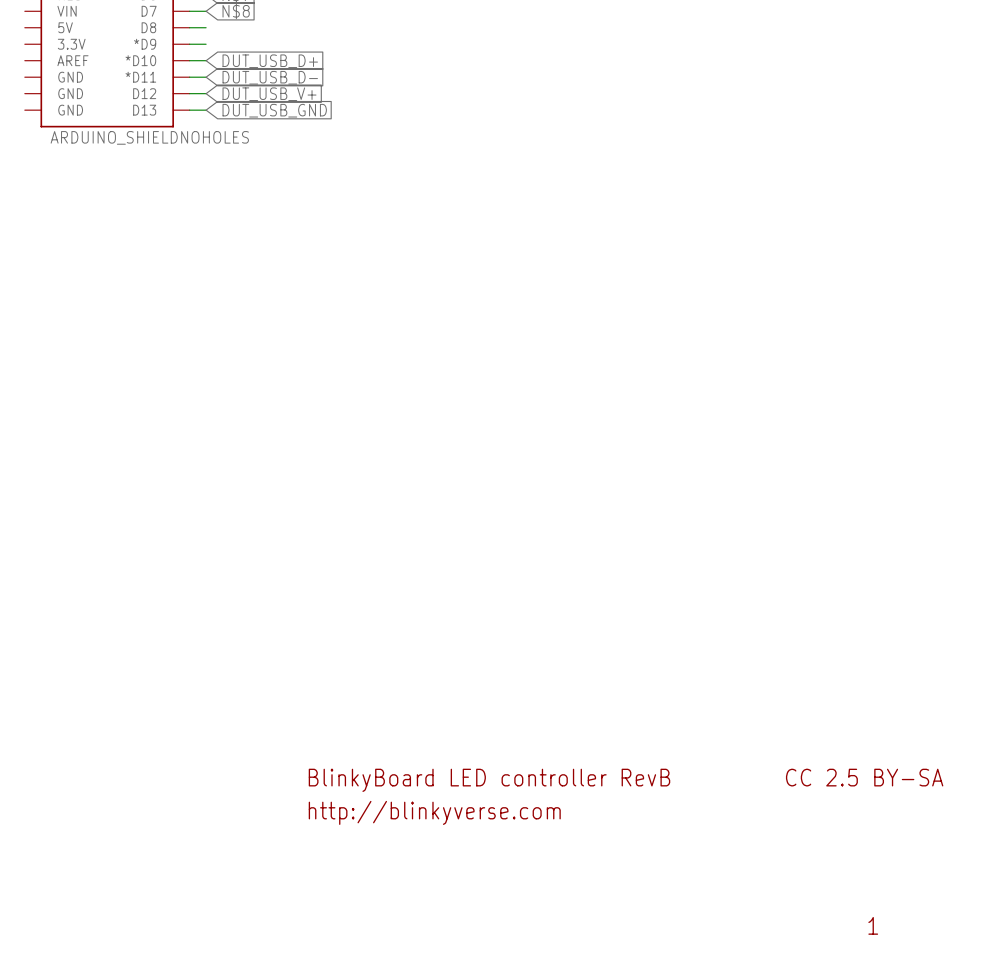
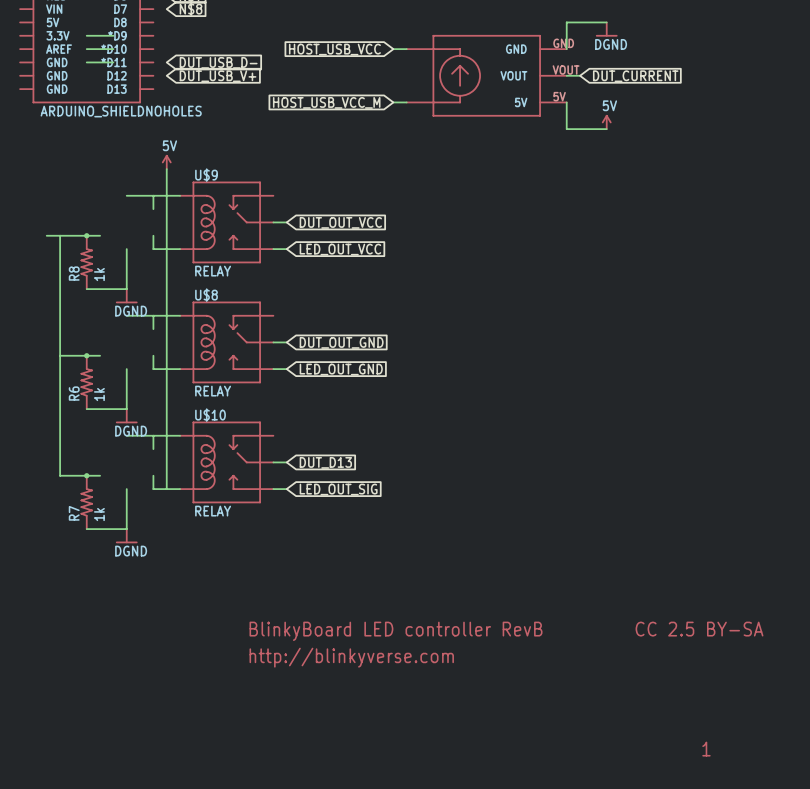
wire: (189, 11) (206, 11) -> none
wire: (189, 27) (206, 27) -> none
wire: none -> (606, 22) (566, 22) (566, 49)
power symbol: none -> DGND (606, 29)
wire: none -> (86, 35) (113, 35)
wire: (189, 44) (206, 44) -> none
wire: none -> (86, 49) (113, 49)
wire: (189, 60) (206, 60) -> none
wire: none -> (393, 49) (406, 49)
global label: DUT_USB_D+ (270, 61) -> none
global label: none -> HOST_USB_VCC (334, 49)
wire: none -> (86, 62) (113, 62)
wire: (189, 77) (206, 77) -> none
wire: (189, 93) (206, 93) -> none
part: none -> (486, 75)
wire: none -> (566, 75) (580, 75)
global label: none -> DUT_CURRENT (635, 76)
wire: (189, 110) (206, 110) -> none
global label: DUT_USB_GND (274, 110) -> none
wire: none -> (393, 102) (406, 102)
wire: none -> (566, 102) (566, 129) (606, 129)
global label: none -> HOST_USB_VCC_M (326, 102)
power symbol: none -> 5V (606, 122)
power symbol: none -> 5V (166, 162)
wire: none -> (166, 169) (166, 489)
wire: none -> (126, 195) (180, 195)
wire: none -> (153, 195) (153, 209)
U$9: none -> RELAY (226, 222)
wire: none -> (273, 222) (286, 222)
global label: none -> DUT_OUT_VCC (340, 222)
wire: none -> (46, 235) (100, 235)
wire: none -> (60, 235) (60, 475) (100, 475)
junction: none -> (86, 235)
wire: none -> (153, 235) (153, 249) (180, 249)
wire: none -> (126, 249) (126, 289) (86, 289)
wire: none -> (273, 249) (286, 249)
global label: none -> LED_OUT_VCC (340, 249)
R8: none -> 1k (86, 262)
power symbol: none -> DGND (126, 296)
wire: none -> (126, 315) (180, 315)
wire: none -> (153, 315) (153, 329)
U$8: none -> RELAY (226, 342)
wire: none -> (273, 342) (286, 342)
global label: none -> DUT_OUT_GND (341, 342)
wire: none -> (60, 355) (100, 355)
junction: none -> (86, 355)
wire: none -> (153, 355) (153, 369) (180, 369)
wire: none -> (126, 369) (126, 409) (86, 409)
wire: none -> (273, 369) (286, 369)
global label: none -> LED_OUT_GND (341, 369)
R6: none -> 1k (86, 382)
power symbol: none -> DGND (126, 416)
wire: none -> (126, 435) (180, 435)
wire: none -> (153, 435) (153, 449)
U$10: none -> RELAY (226, 462)
wire: none -> (273, 462) (286, 462)
global label: none -> DUT_D13 (325, 462)
junction: none -> (86, 475)
wire: none -> (153, 475) (153, 489) (180, 489)
wire: none -> (126, 489) (126, 529) (86, 529)
wire: none -> (273, 489) (286, 489)
global label: none -> LED_OUT_SIG (338, 489)
R7: none -> 1k (86, 502)
power symbol: none -> DGND (126, 536)

